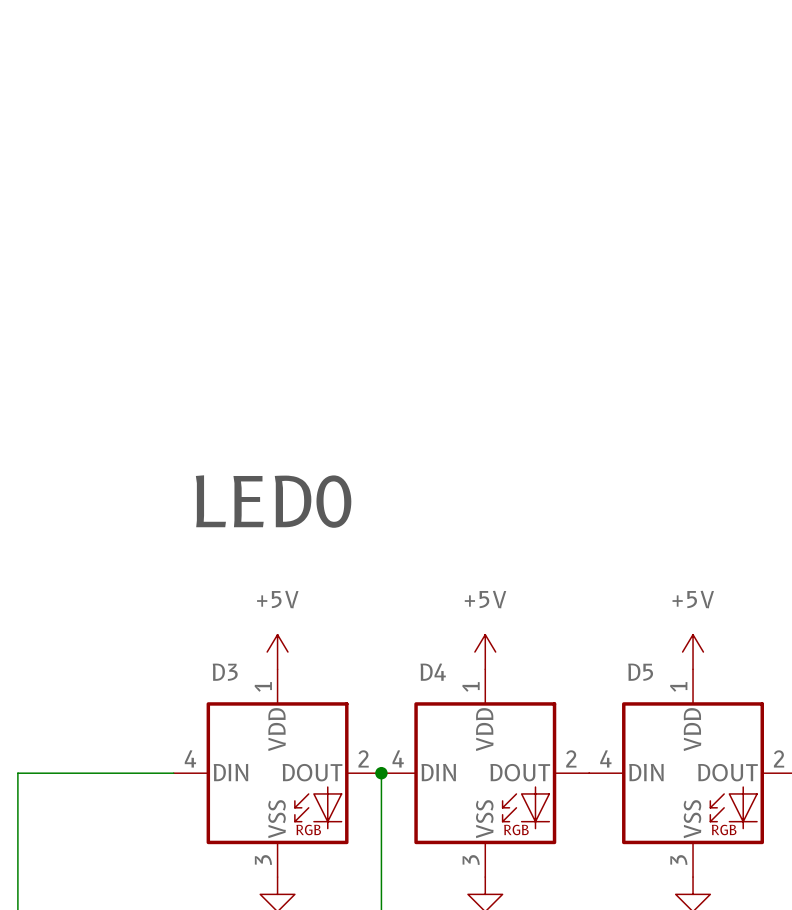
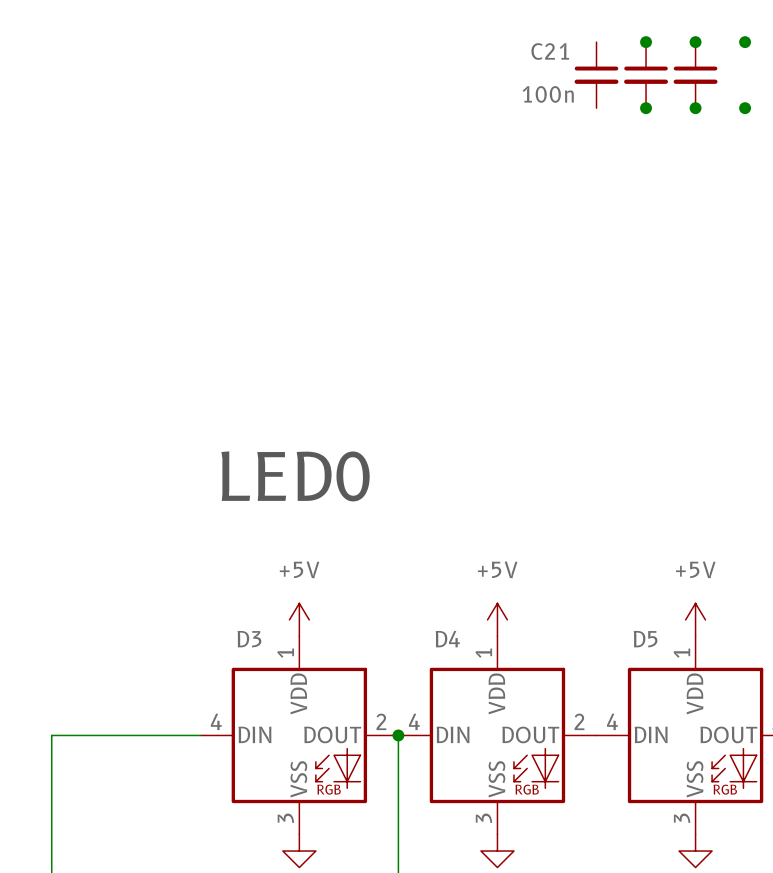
junction: none -> (646, 42)
junction: none -> (695, 42)
junction: none -> (745, 42)
C21: none -> 100n (596, 75)
part: none -> (646, 75)
part: none -> (695, 75)
junction: none -> (646, 108)
junction: none -> (695, 108)
junction: none -> (745, 108)

